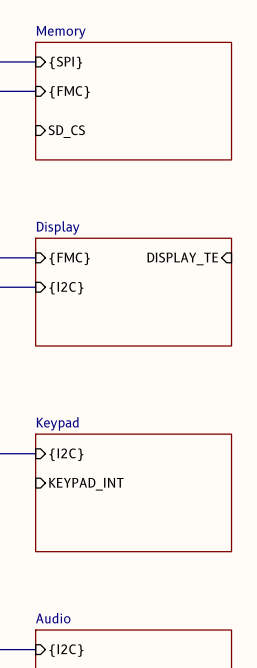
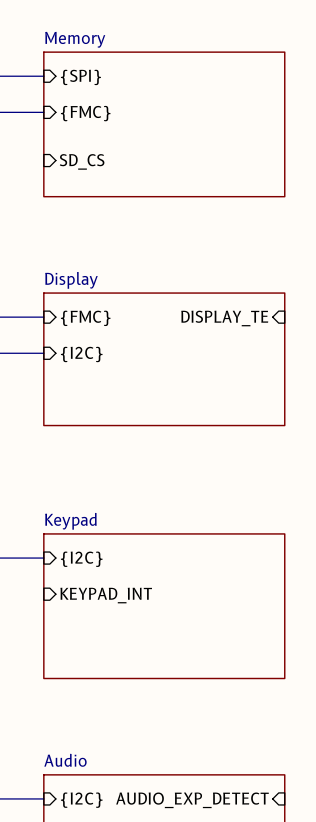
sheet pin: none -> AUDIO_EXP_DETECT (192, 800)

